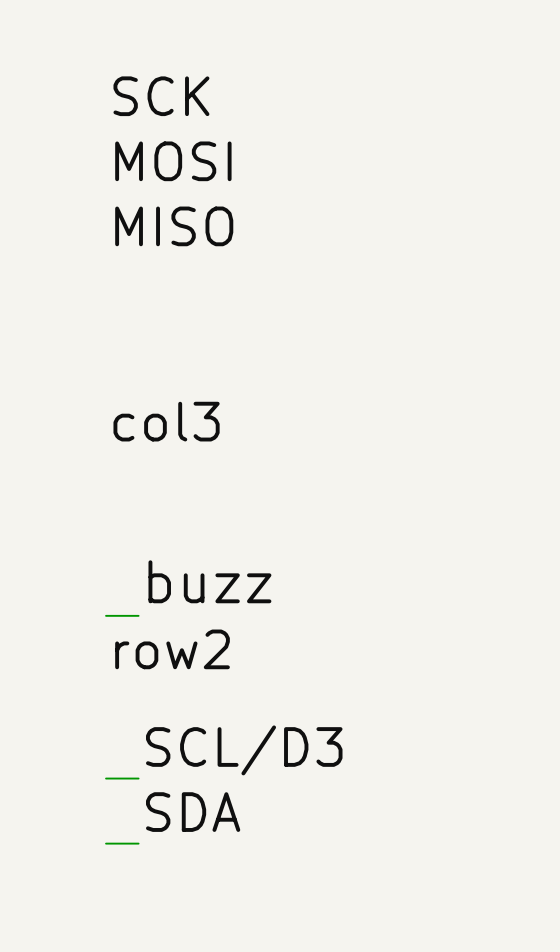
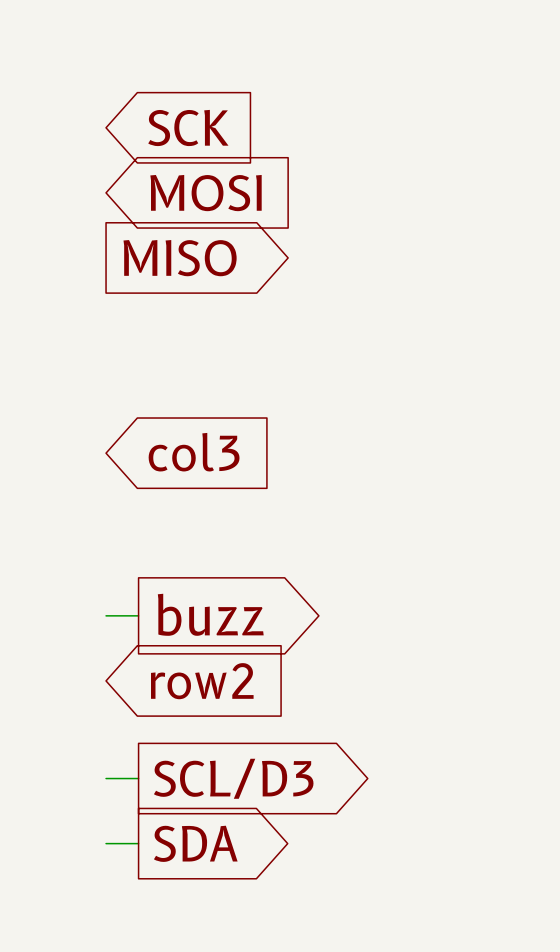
label: SCK (161, 96) -> none
global label: none -> SCK (188, 127)
label: MOSI (173, 161) -> none
global label: none -> MOSI (206, 193)
label: MISO (174, 226) -> none
global label: none -> MISO (180, 258)
label: col3 (166, 421) -> none
global label: none -> col3 (194, 452)
label: buzz (209, 581) -> none
global label: none -> buzz (210, 614)
label: row2 (172, 649) -> none
global label: none -> row2 (202, 681)
label: SCL/D3 (244, 750) -> none
global label: none -> SCL/D3 (233, 778)
label: SDA (193, 812) -> none
global label: none -> SDA (195, 843)

